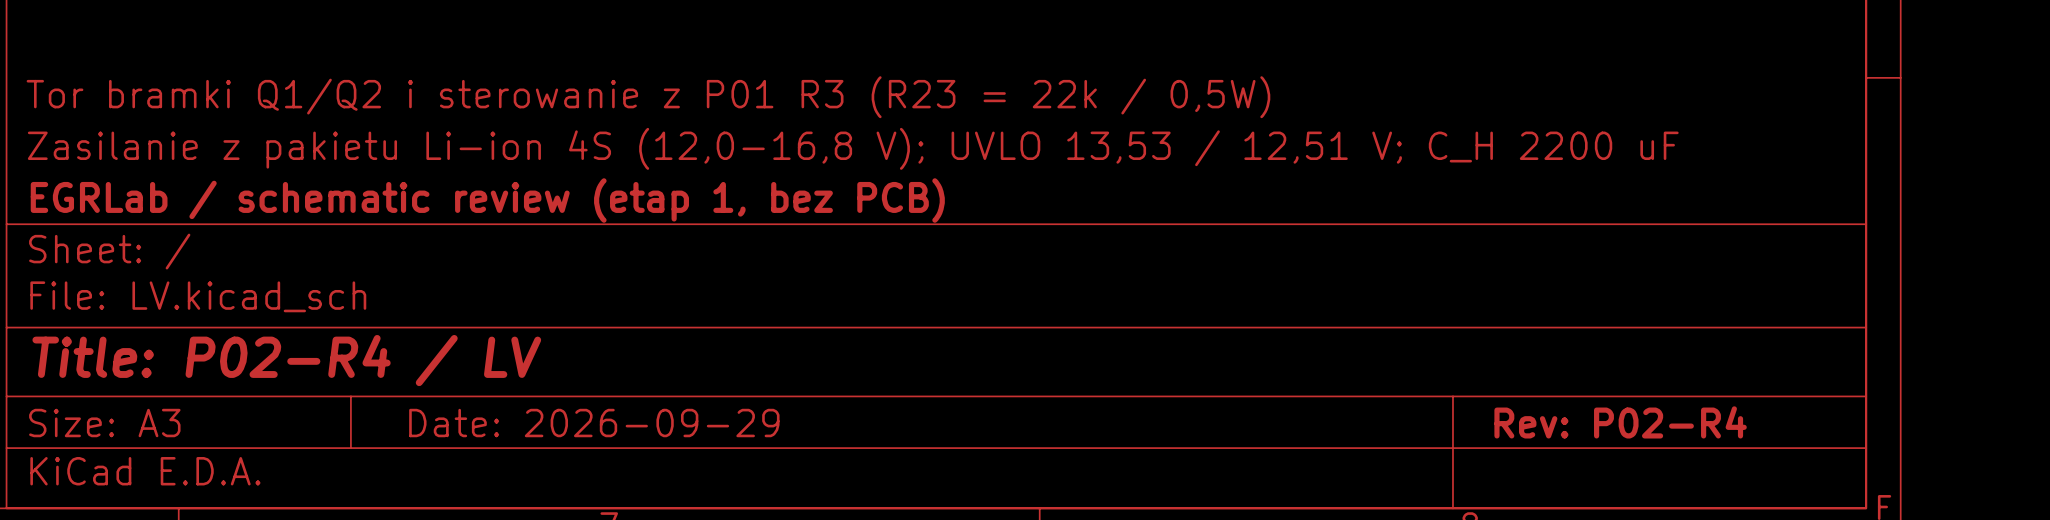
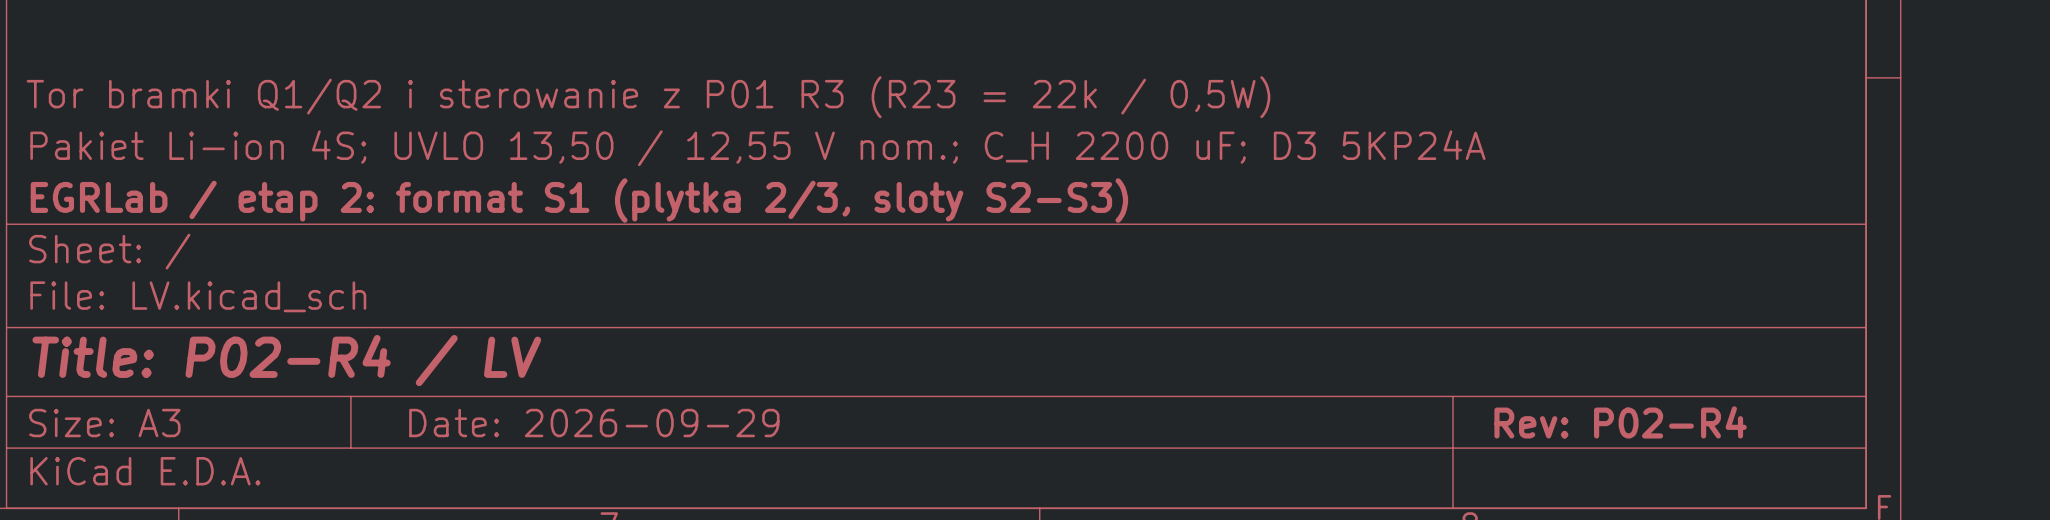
title block: Zasilanie z pakietu Li-ion 4S (12,0-16,8 V); UVLO 13,53 / 12,51 V; C_H 2200 uF (853, 148) -> Pakiet Li-ion 4S; UVLO 13,50 / 12,55 V nom.; C_H 2200 uF; D3 5KP24A (757, 148)
title block: EGRLab / schematic review (etap 1, bez PCB) (487, 200) -> EGRLab / etap 2: format S1 (plytka 2/3, sloty S2-S3) (579, 200)

